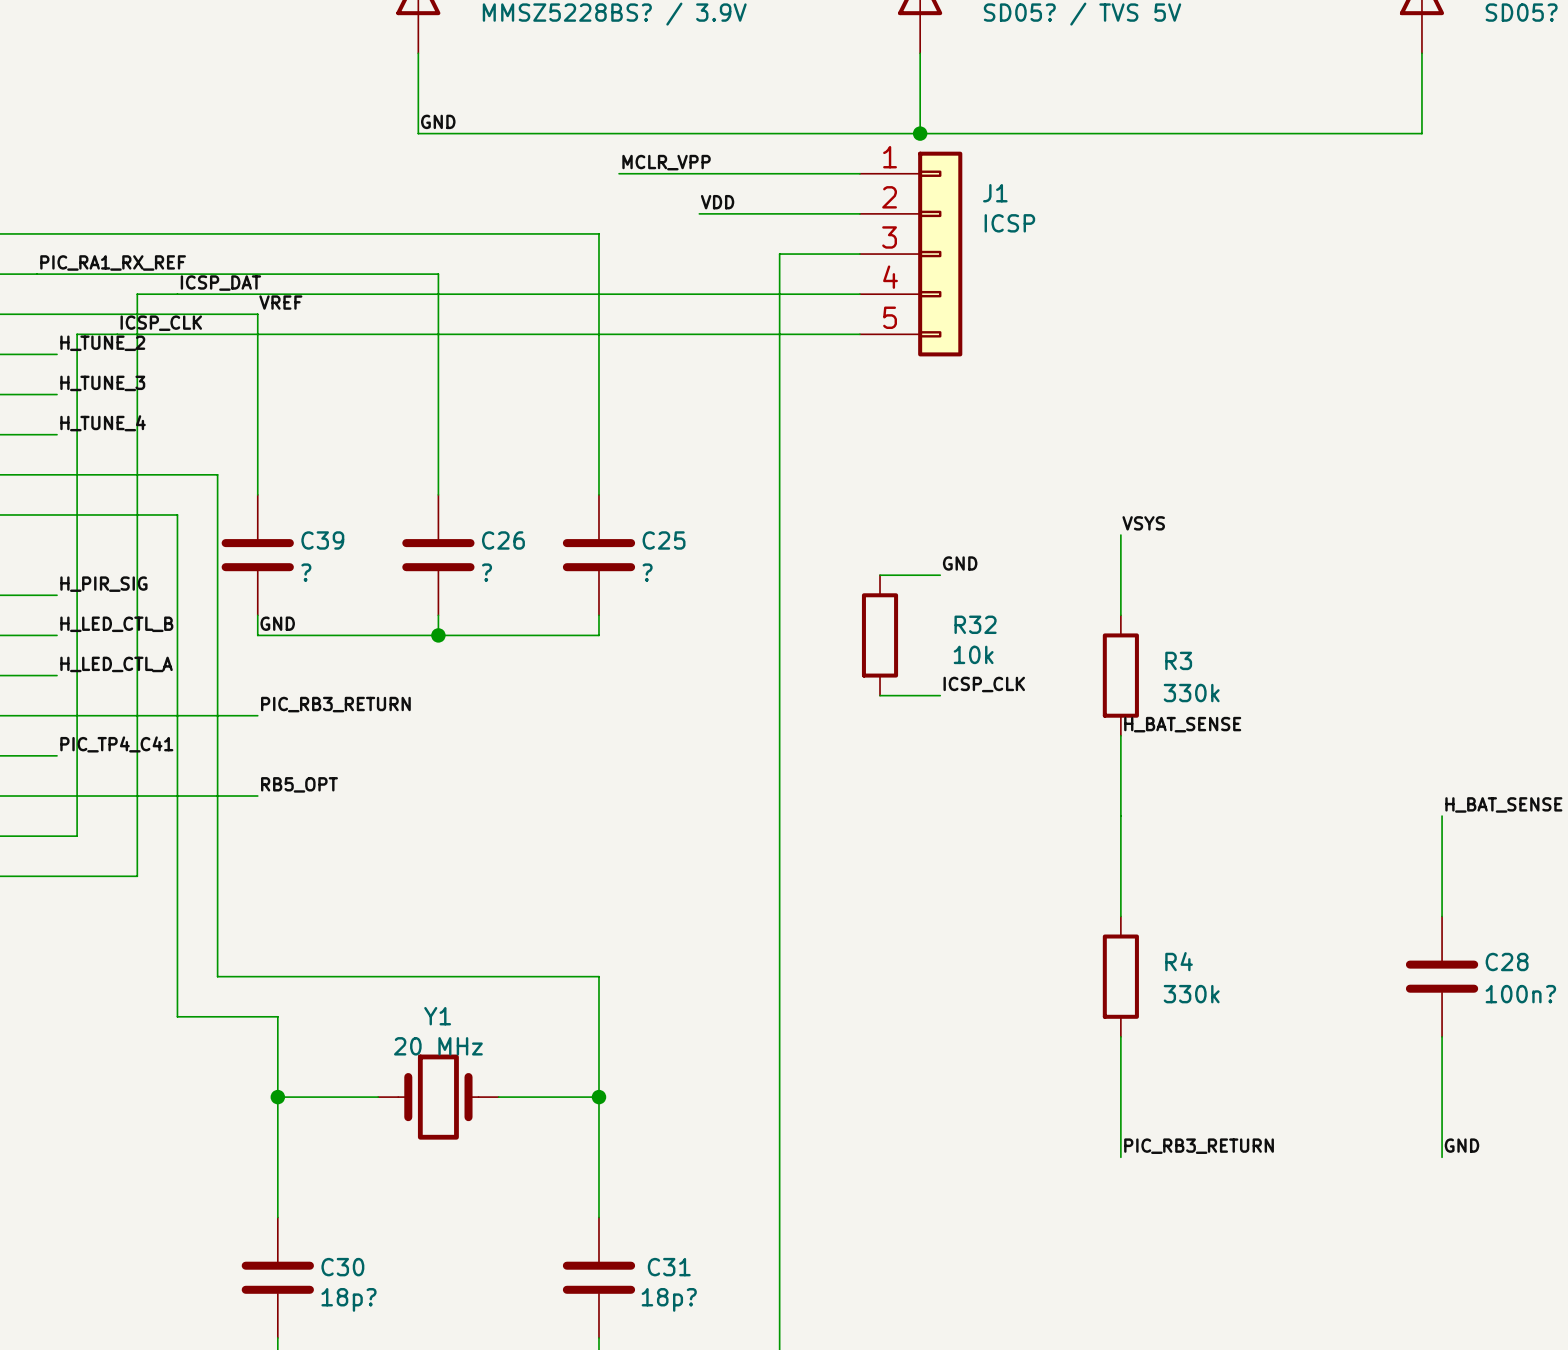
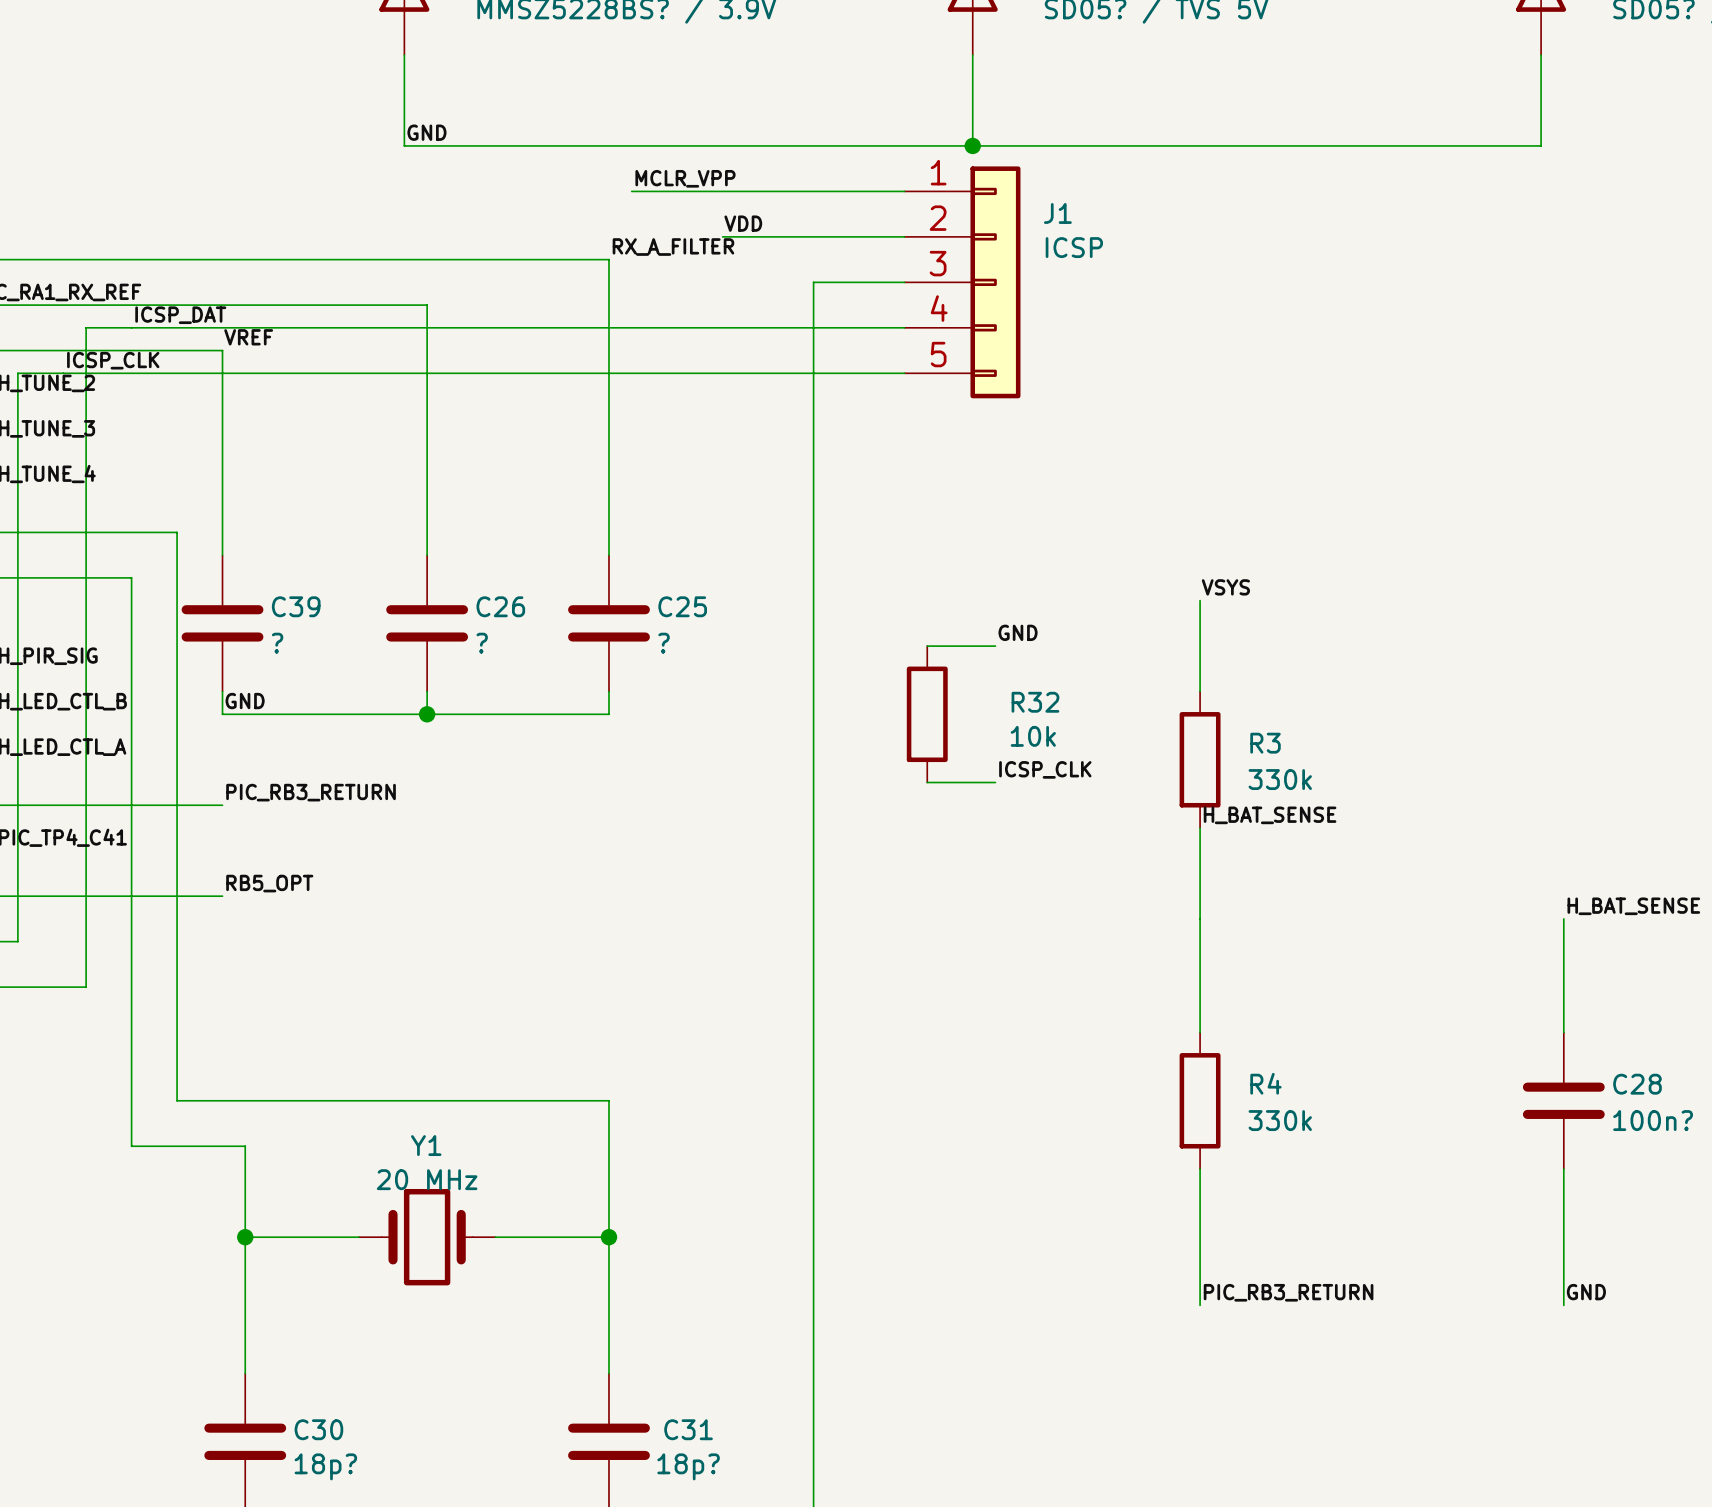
label: none -> RX_A_FILTER (673, 247)

